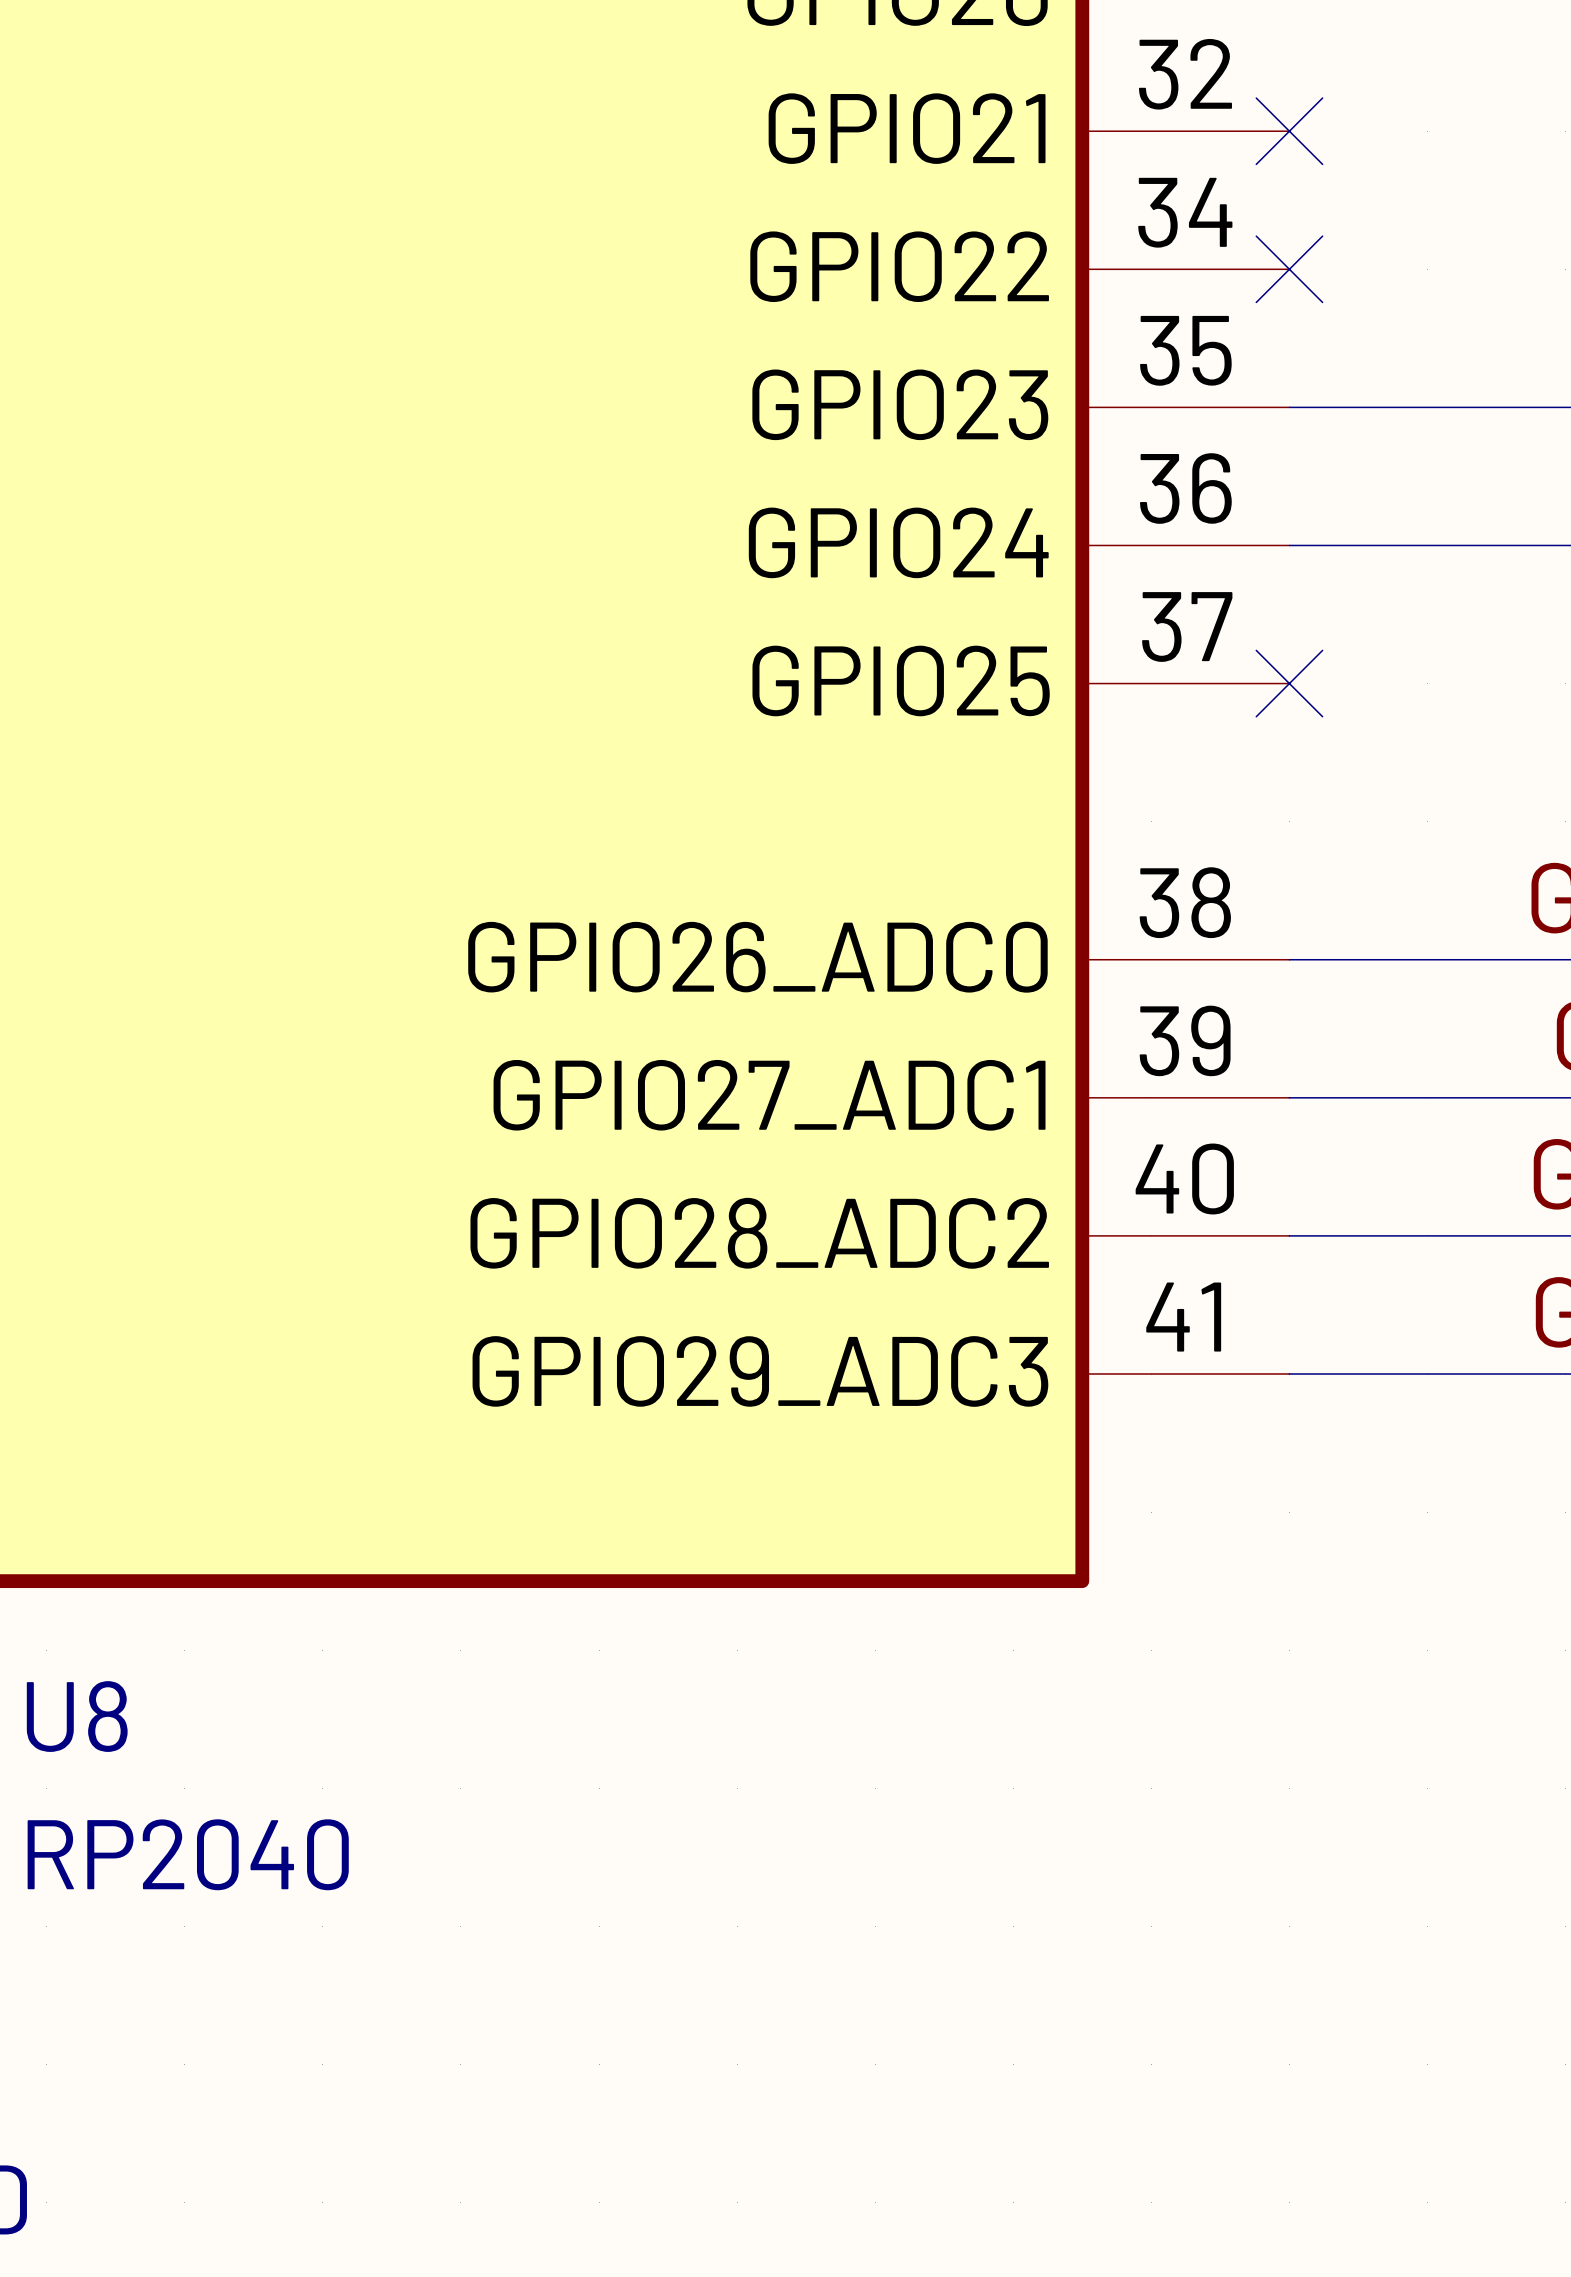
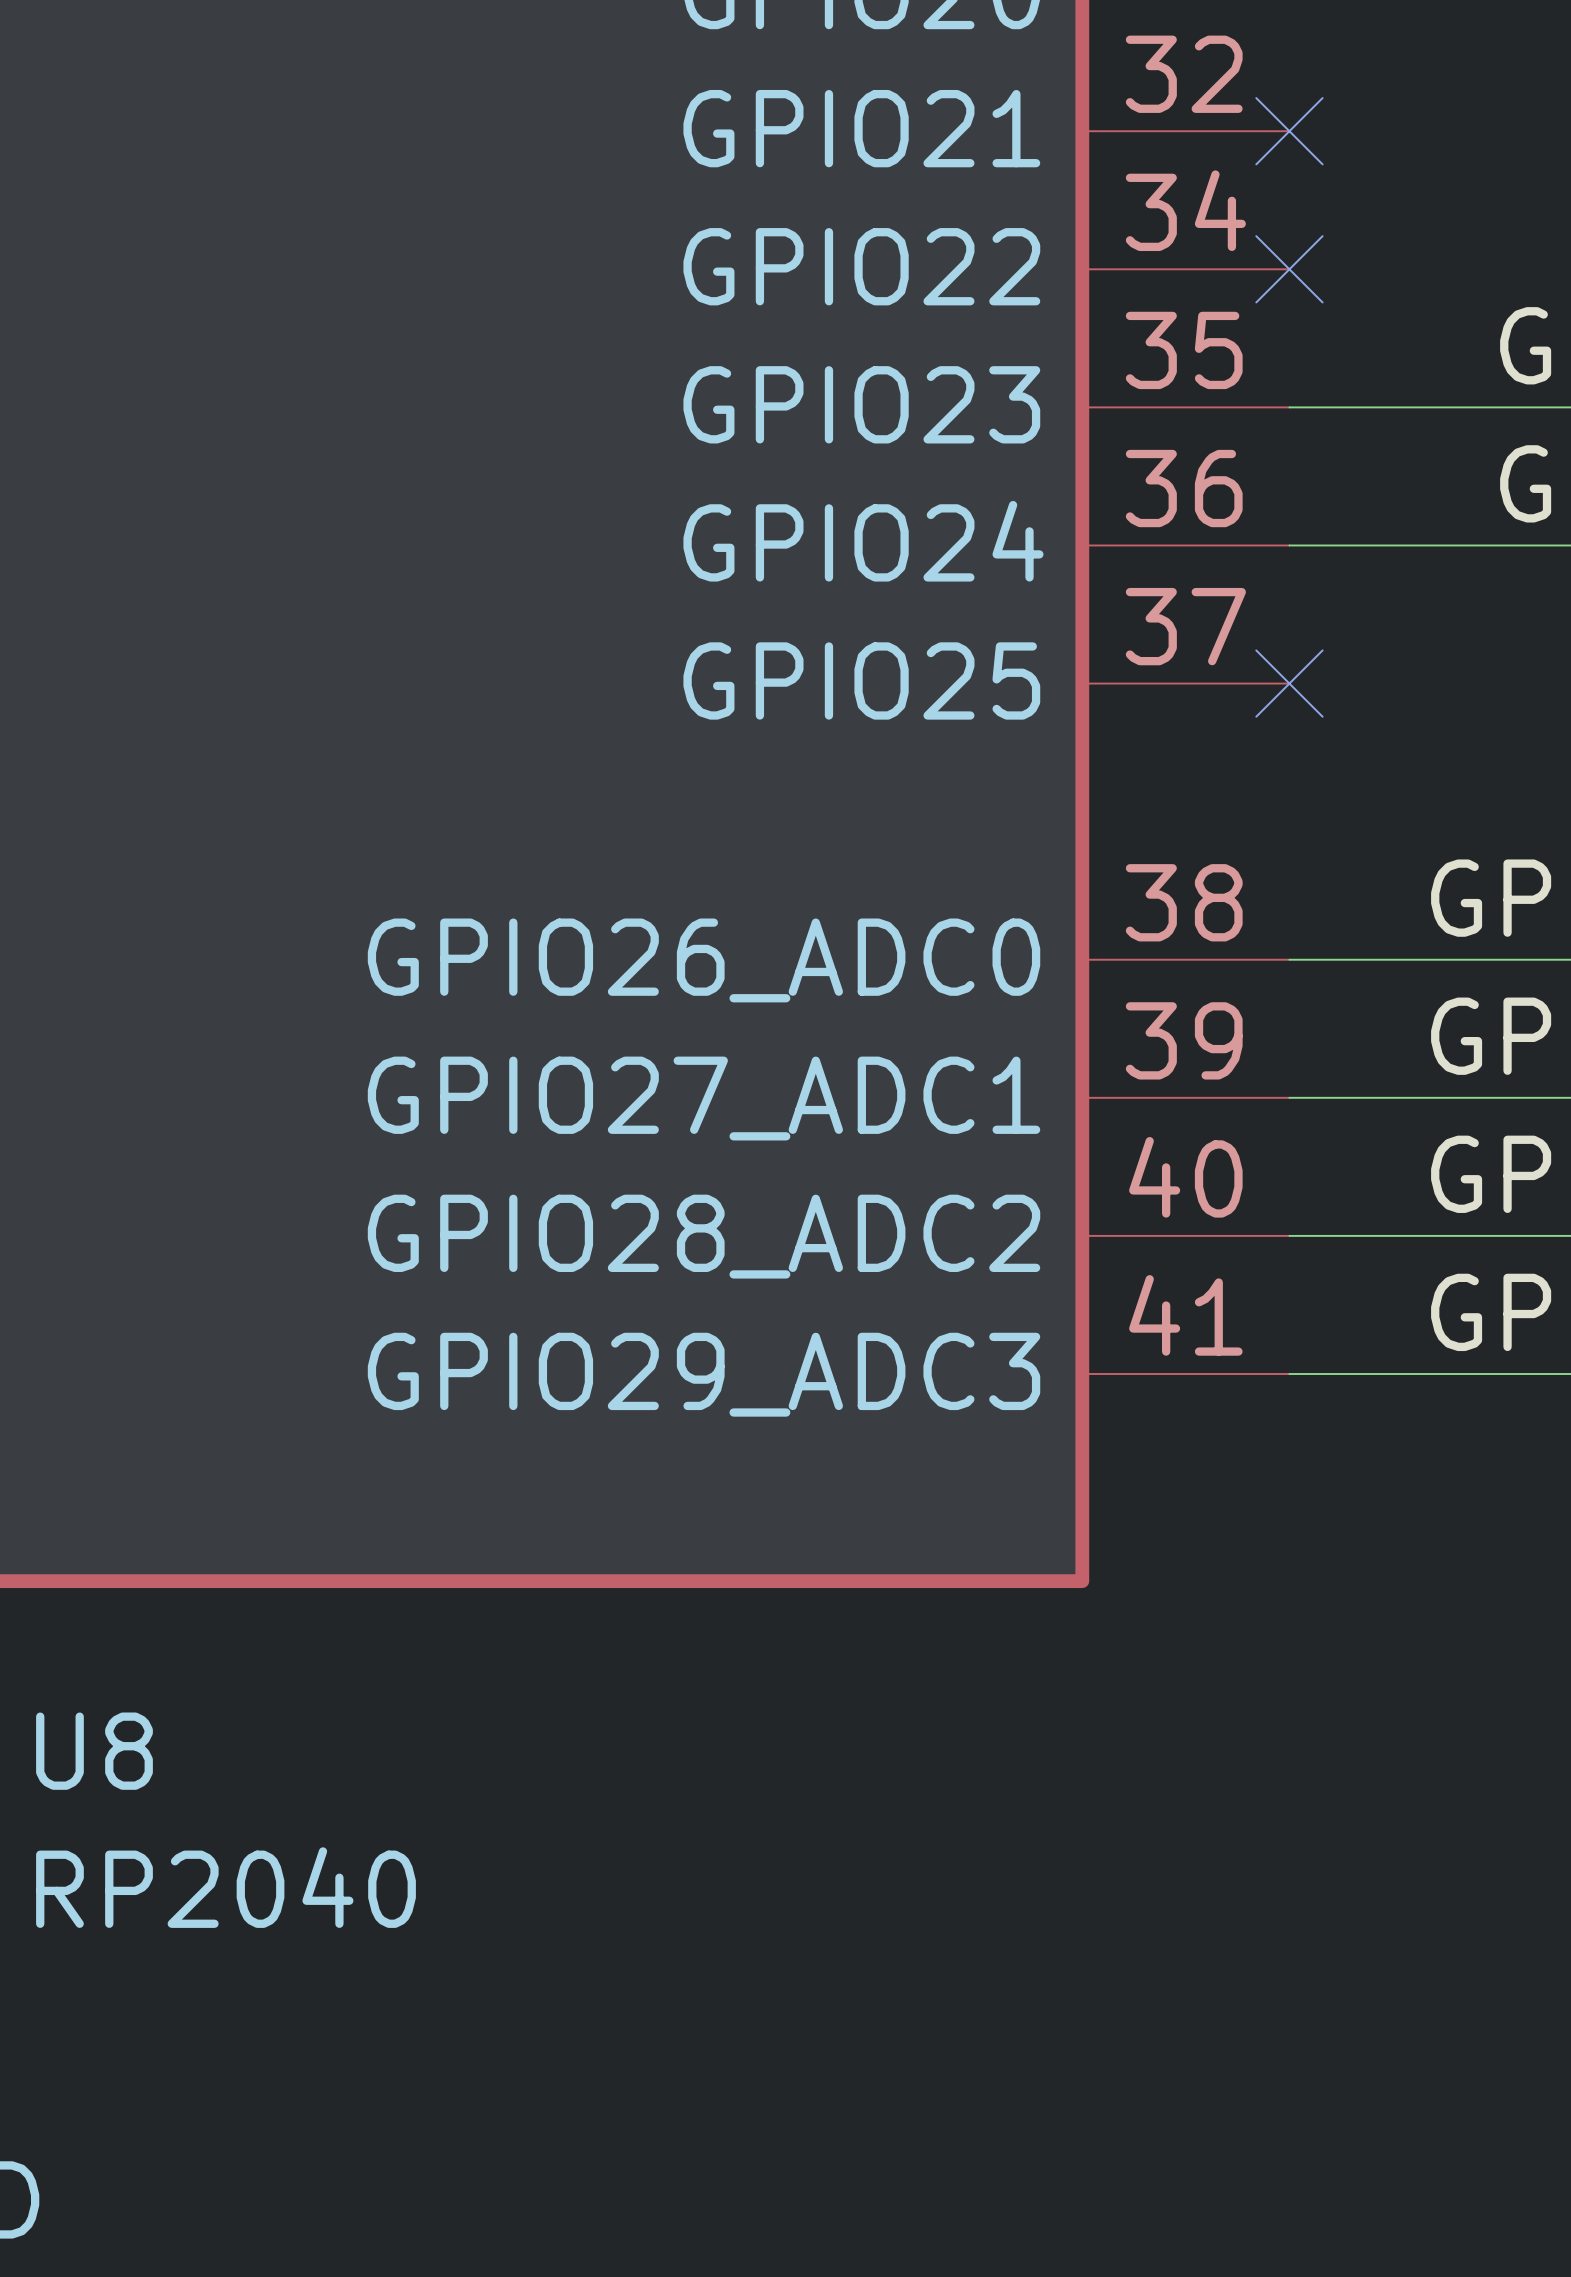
U8 name position: U8 (77, 1716) -> U8 (94, 1751)
U8 value position: RP2040 (188, 1854) -> RP2040 (226, 1887)

